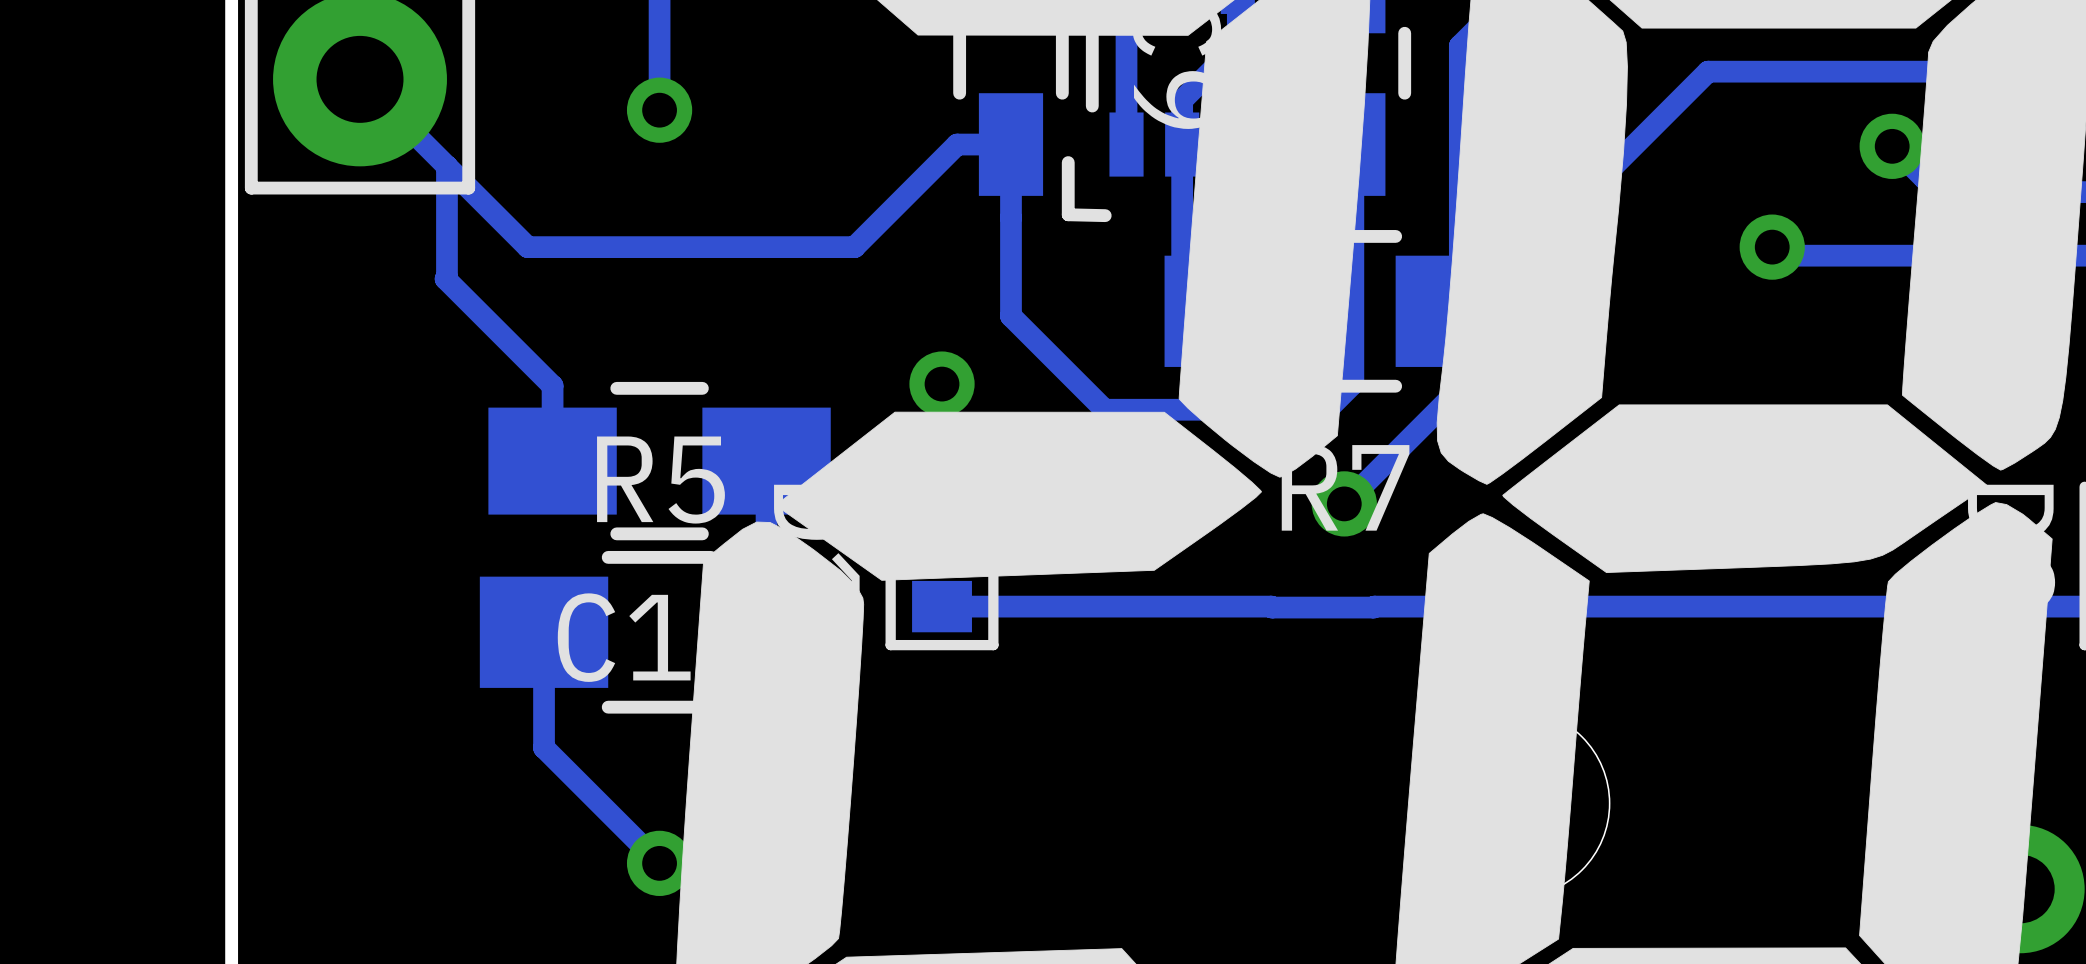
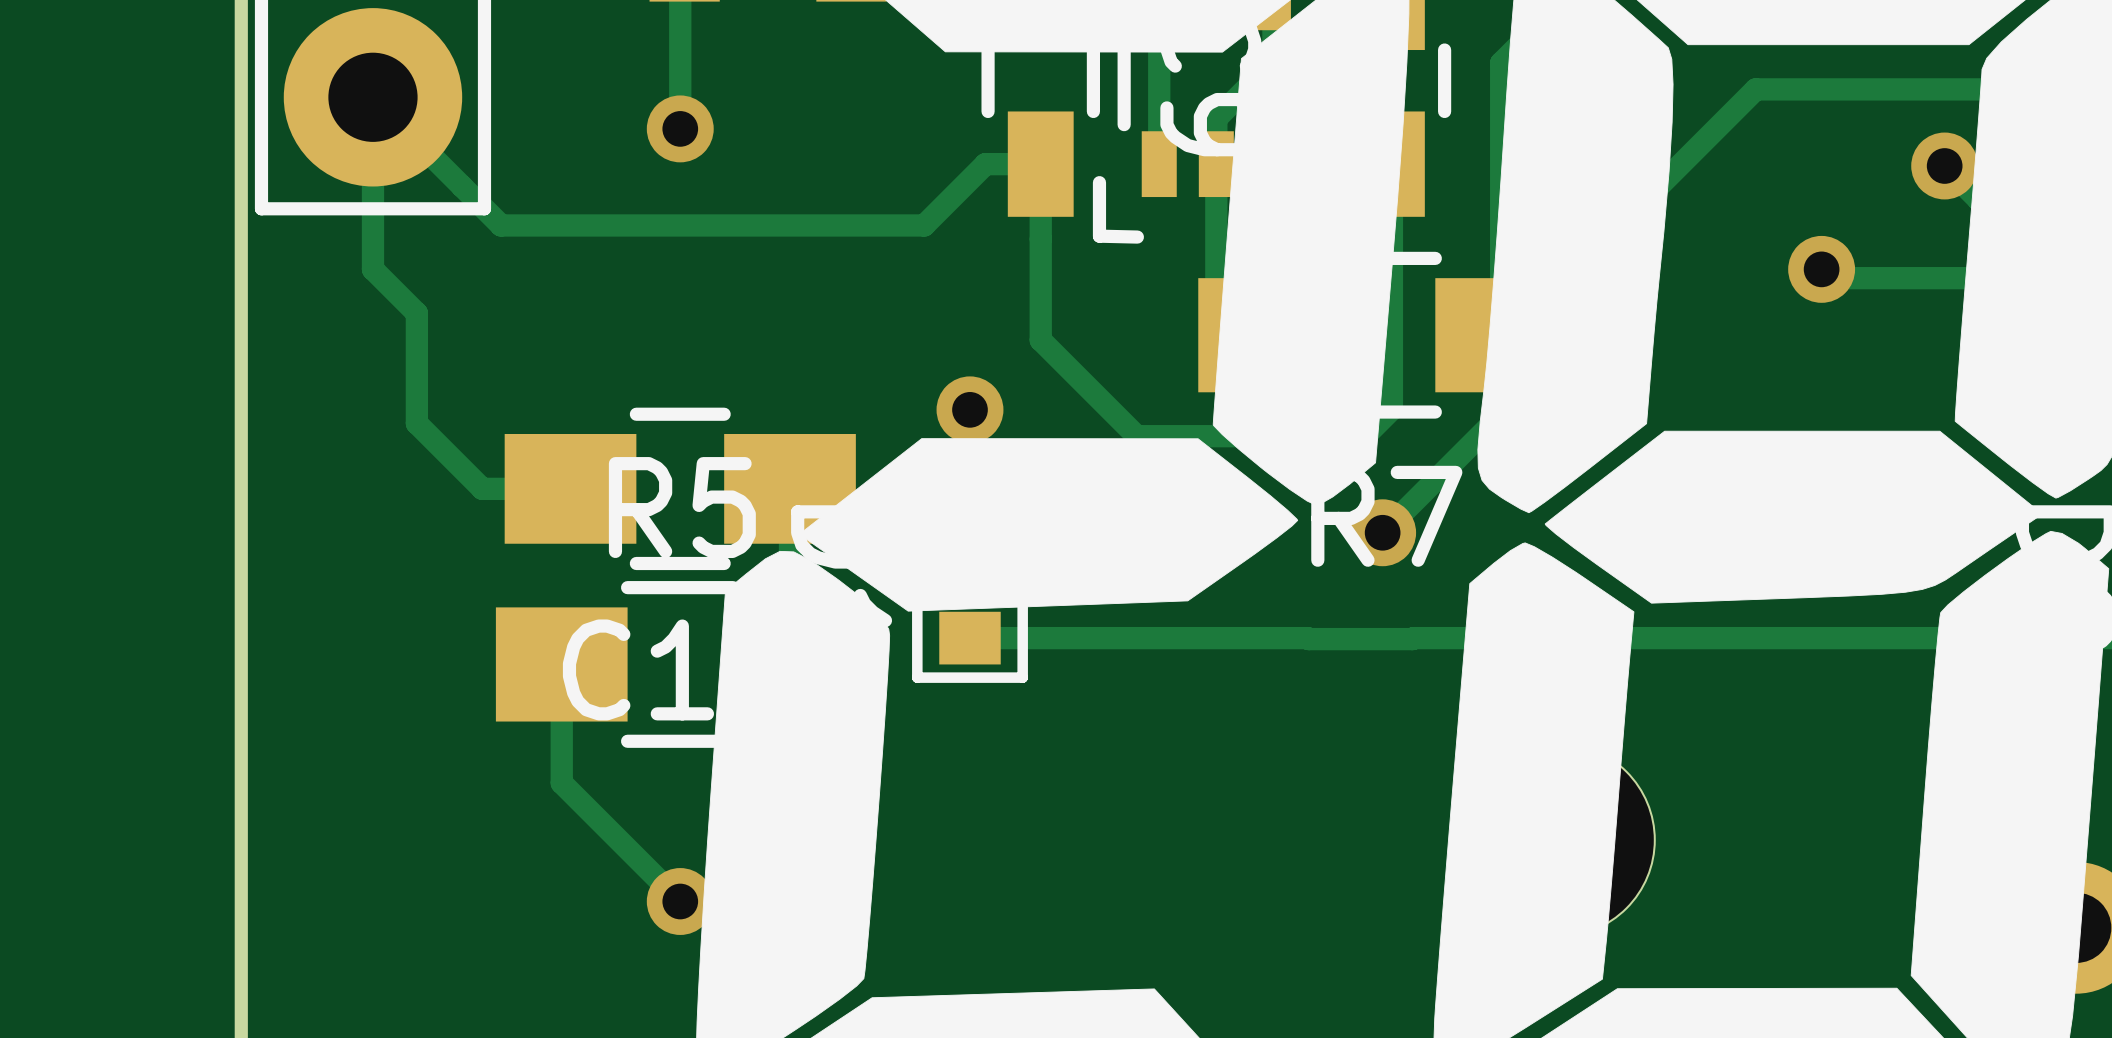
track: (446, 166) (445, 278) (552, 385) (552, 461) -> (372, 97) (372, 269) (416, 313) (416, 423) (482, 488) (570, 488)
track: (897, 204) (854, 247) (527, 247) (484, 204) -> (924, 225) (501, 225)

